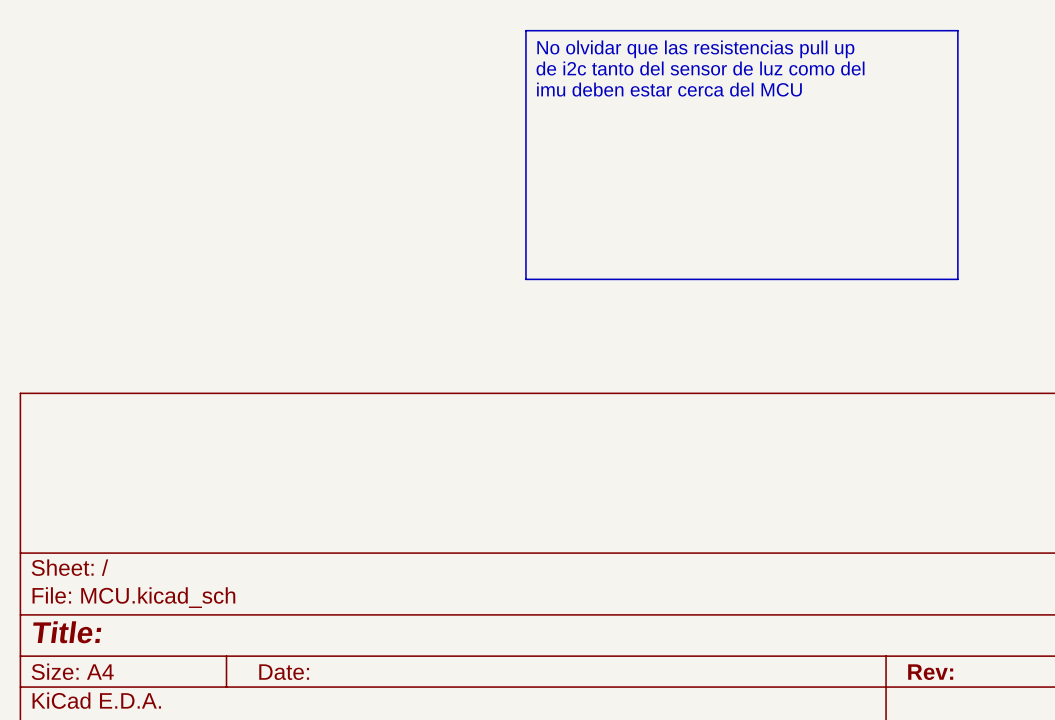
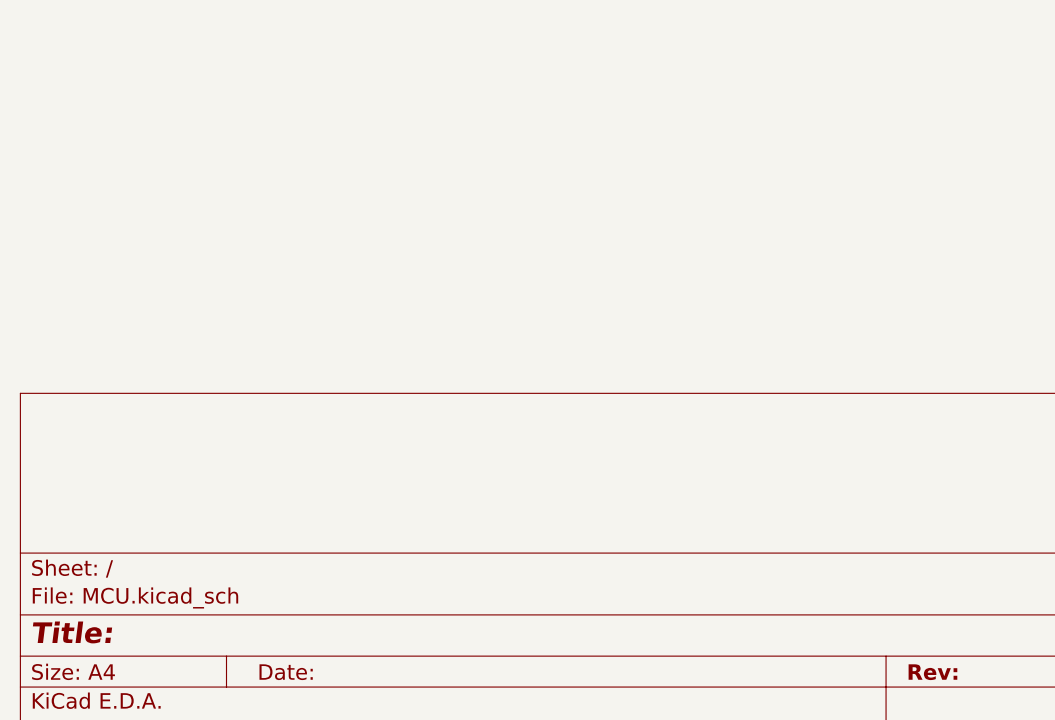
line: (525, 30) (957, 30) (957, 279) (525, 279) (525, 30) -> none
text: No olvidar que las resistencias pull up (695, 49) -> none
text: de i2c tanto del sensor de luz como del (700, 68) -> none
text: imu deben estar cerca del MCU (669, 89) -> none

